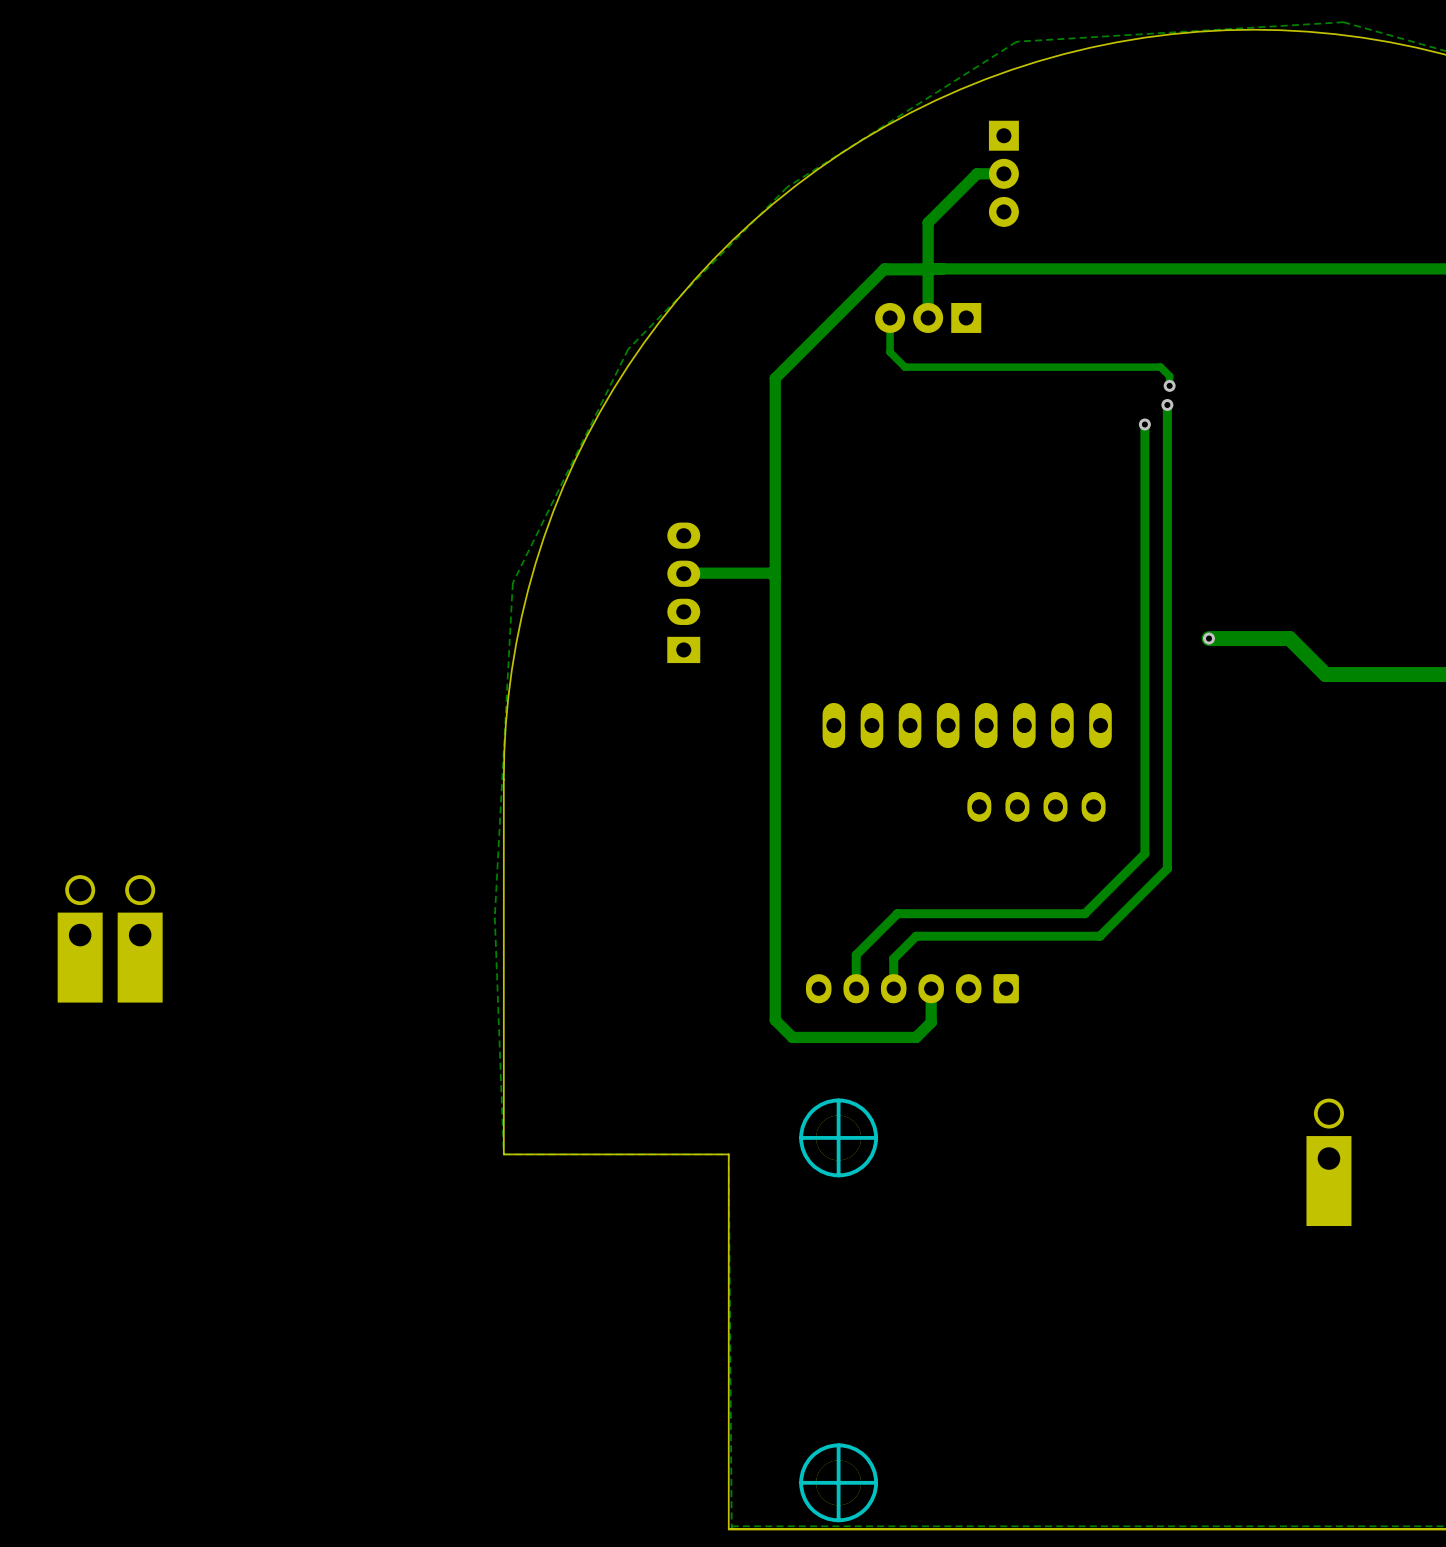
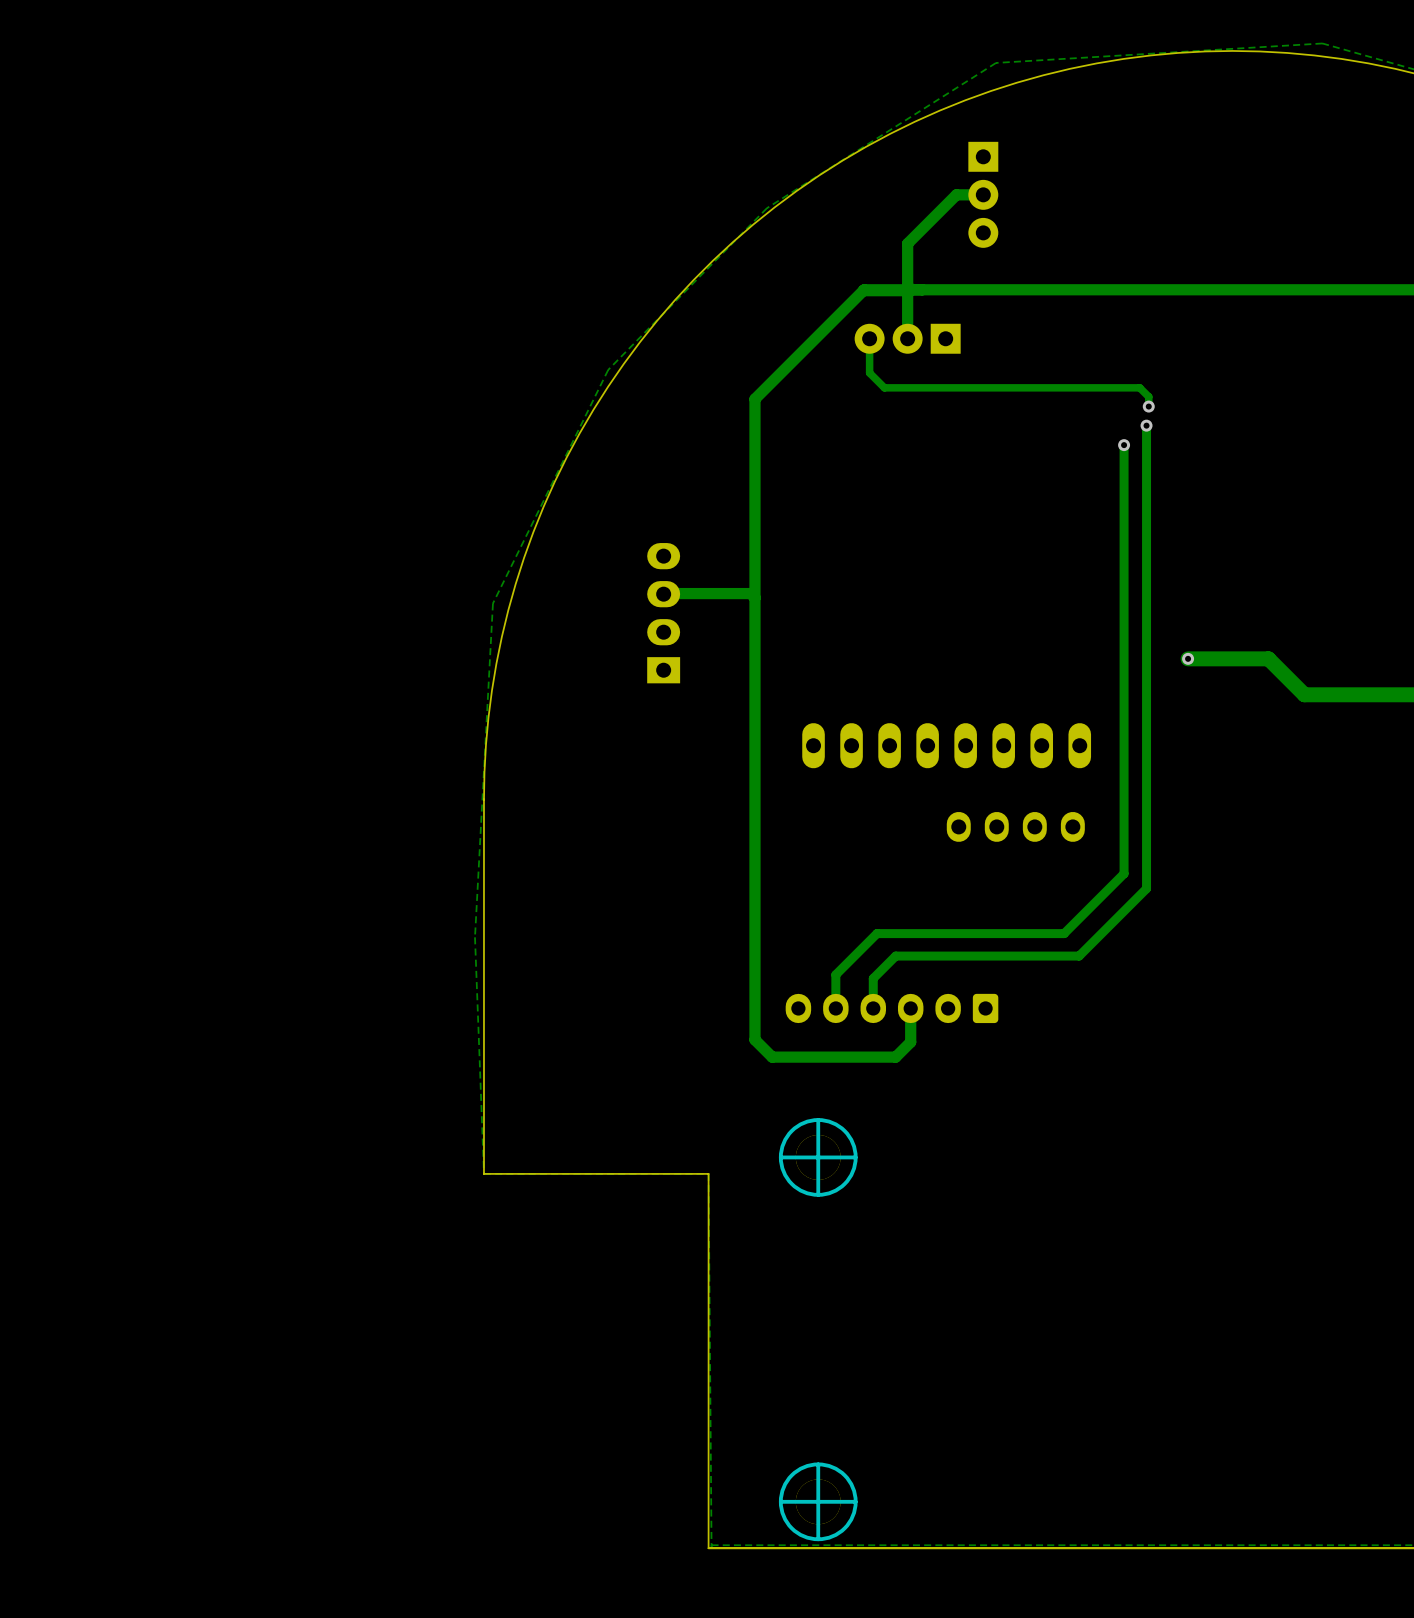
part: (80, 938) -> none
part: (140, 938) -> none
part: (1328, 1162) -> none

